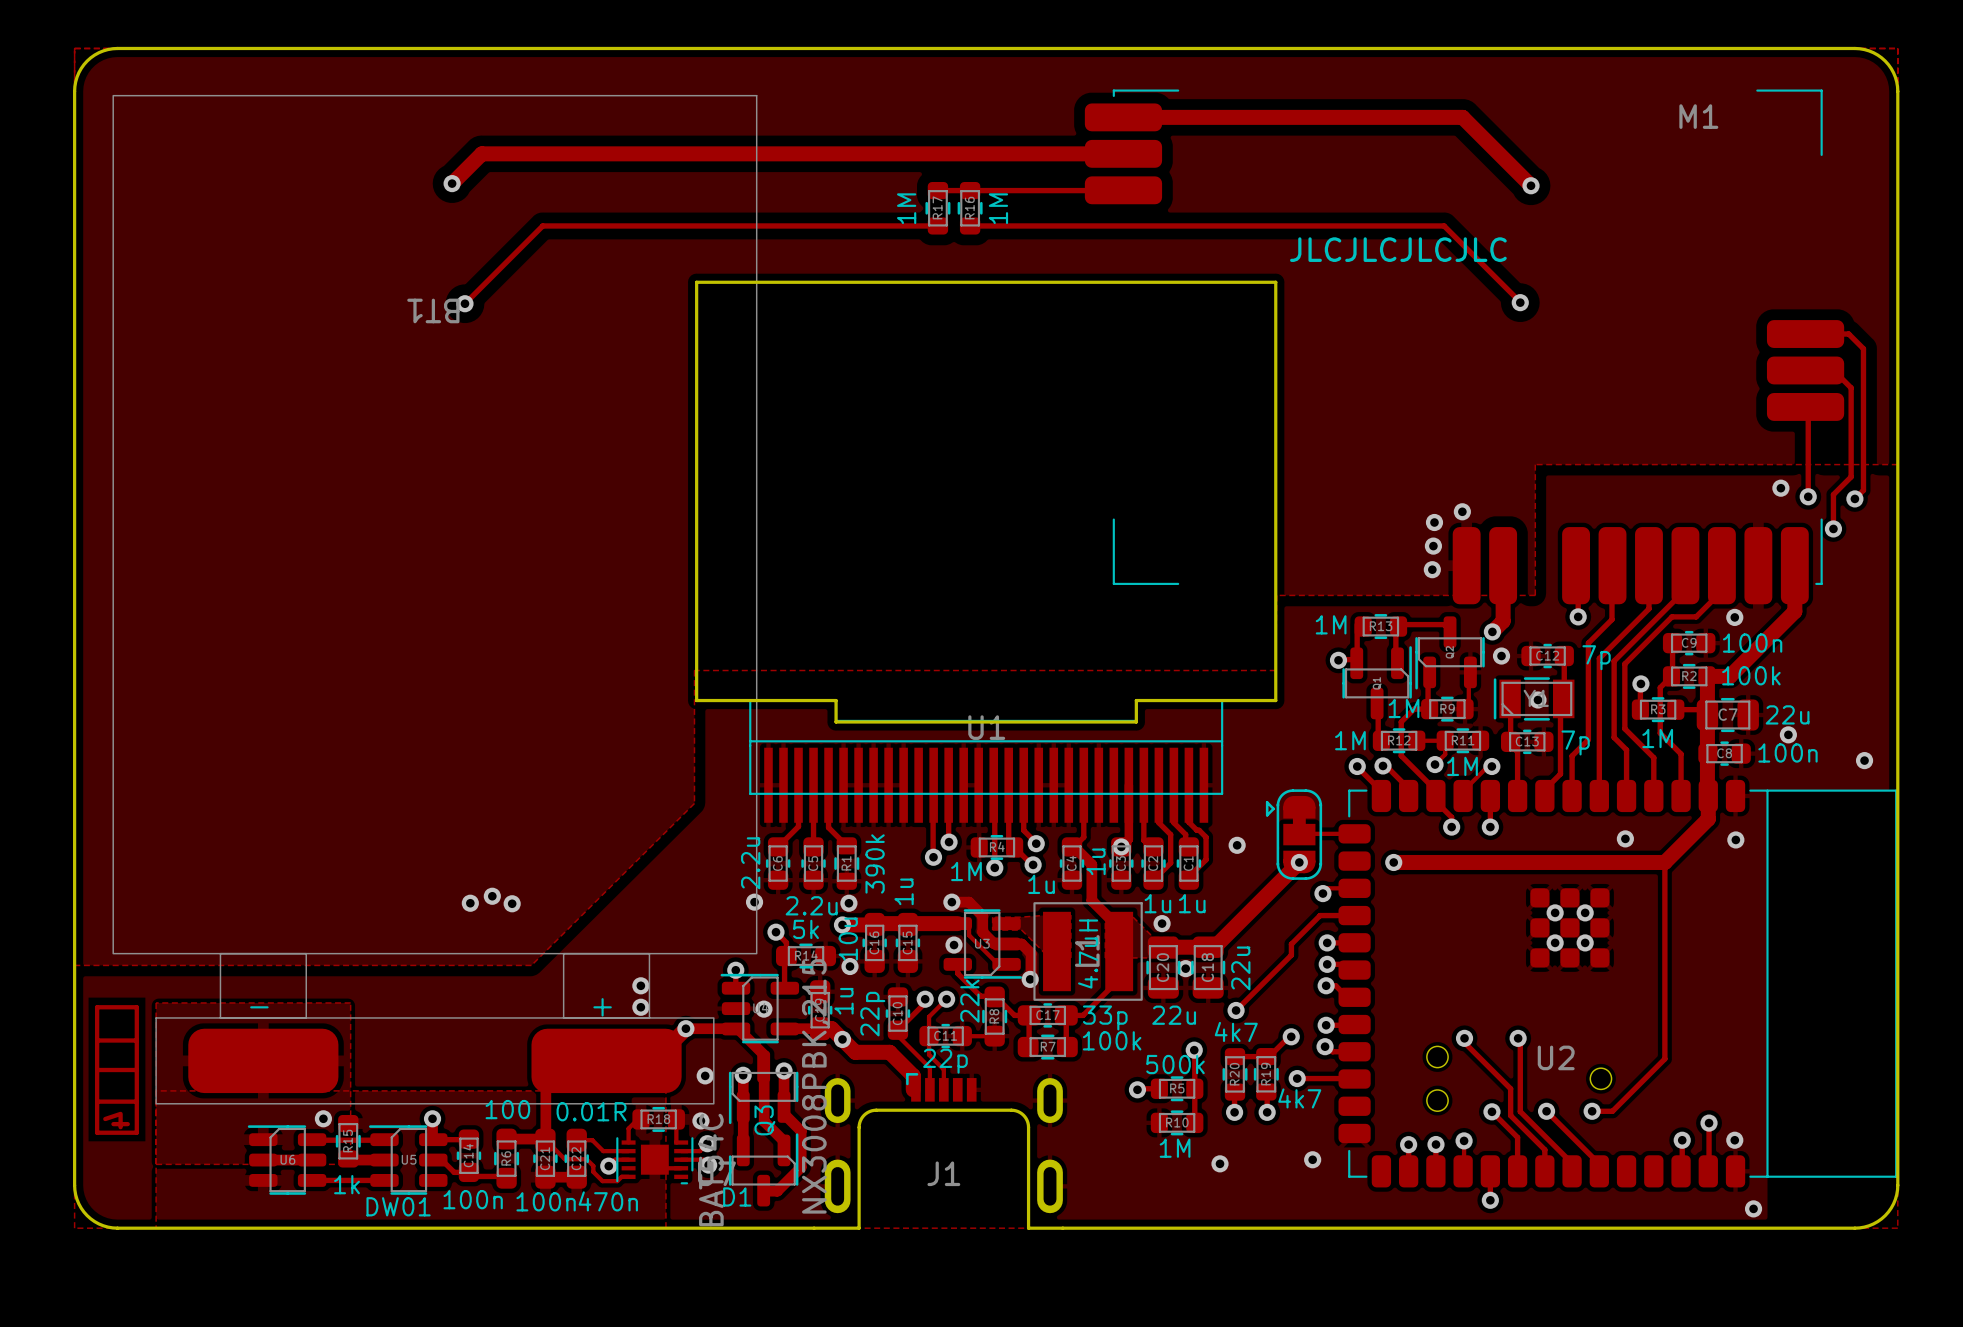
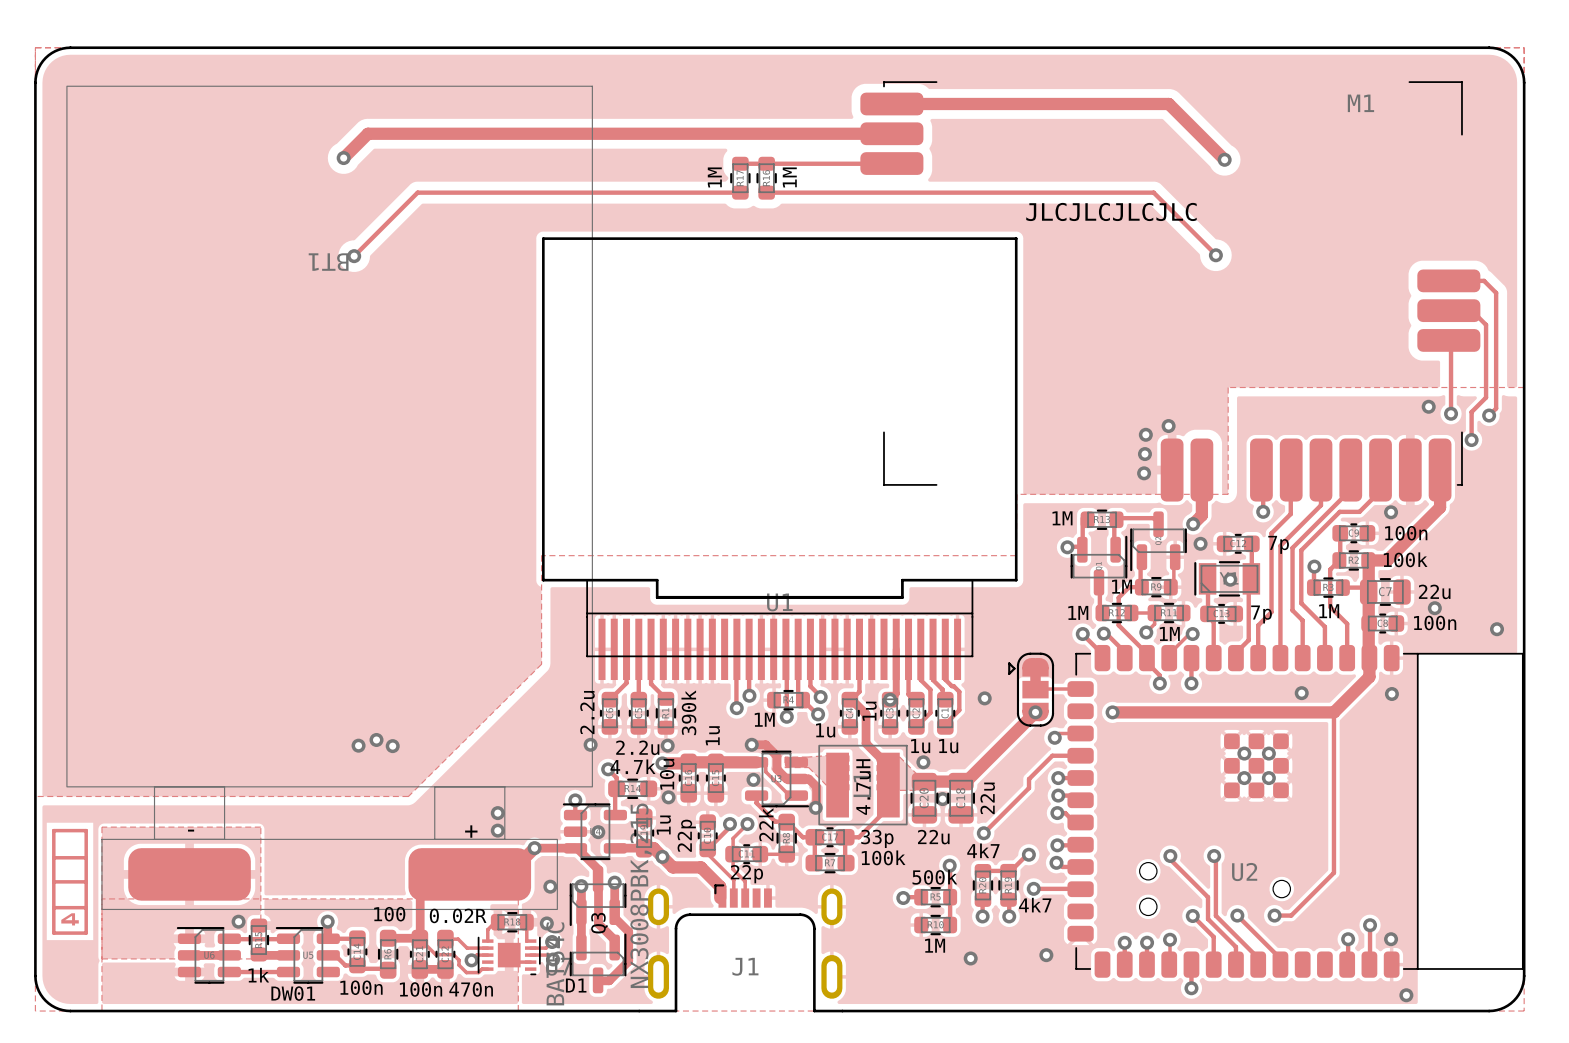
R14 value: 5k (806, 929) -> 4.7k (632, 766)
R18 value: 0.01R (591, 1111) -> 0.02R (458, 915)

